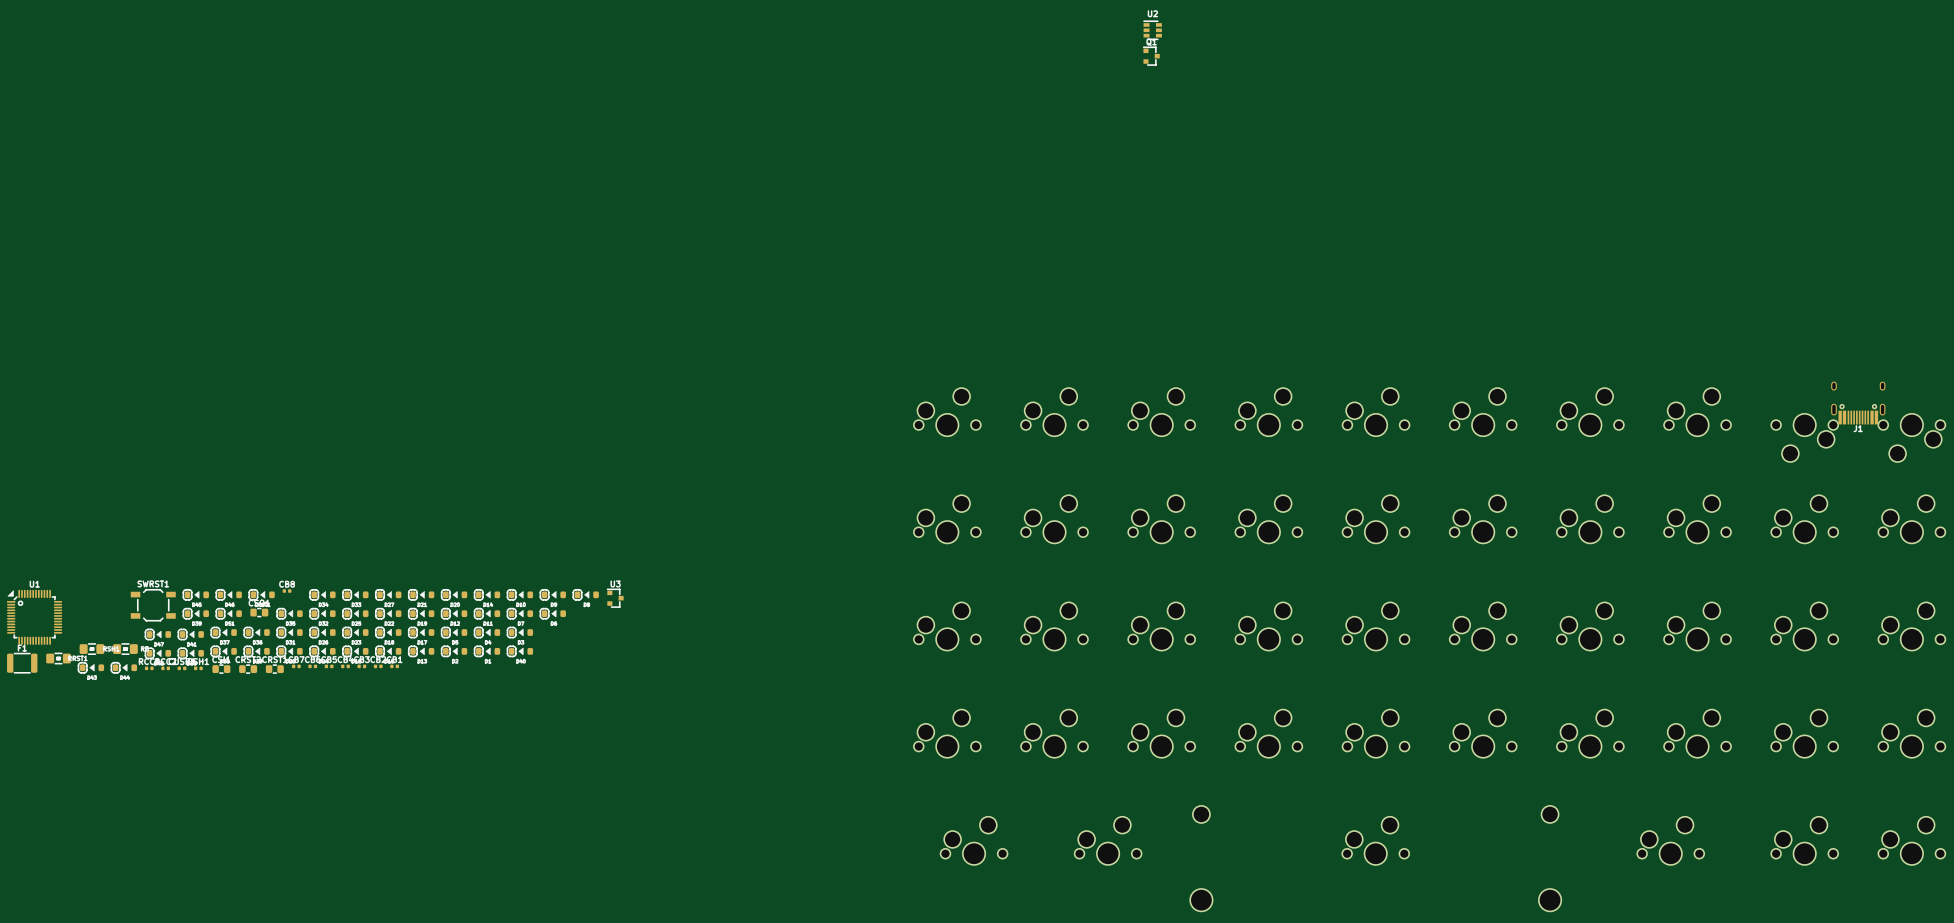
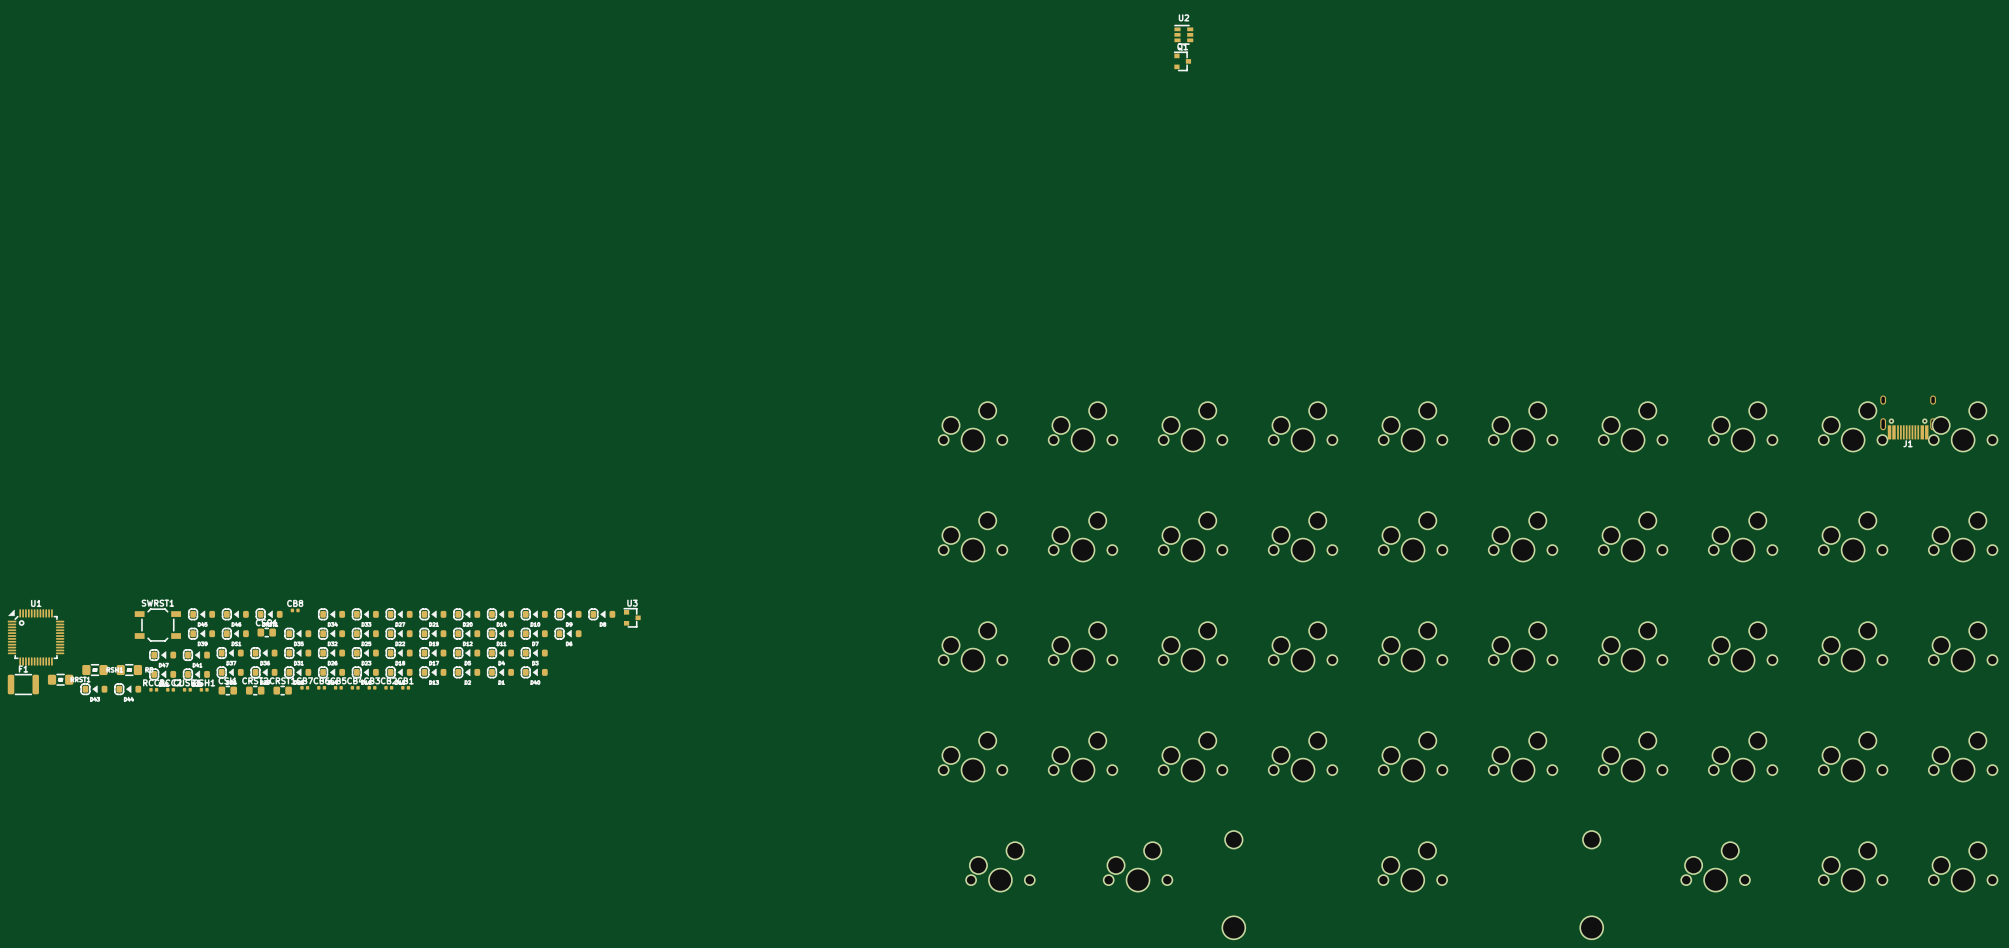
part rotation: 0° (1804, 437) -> 180° (1853, 426)
part rotation: 0° (1911, 437) -> 180° (1963, 426)

